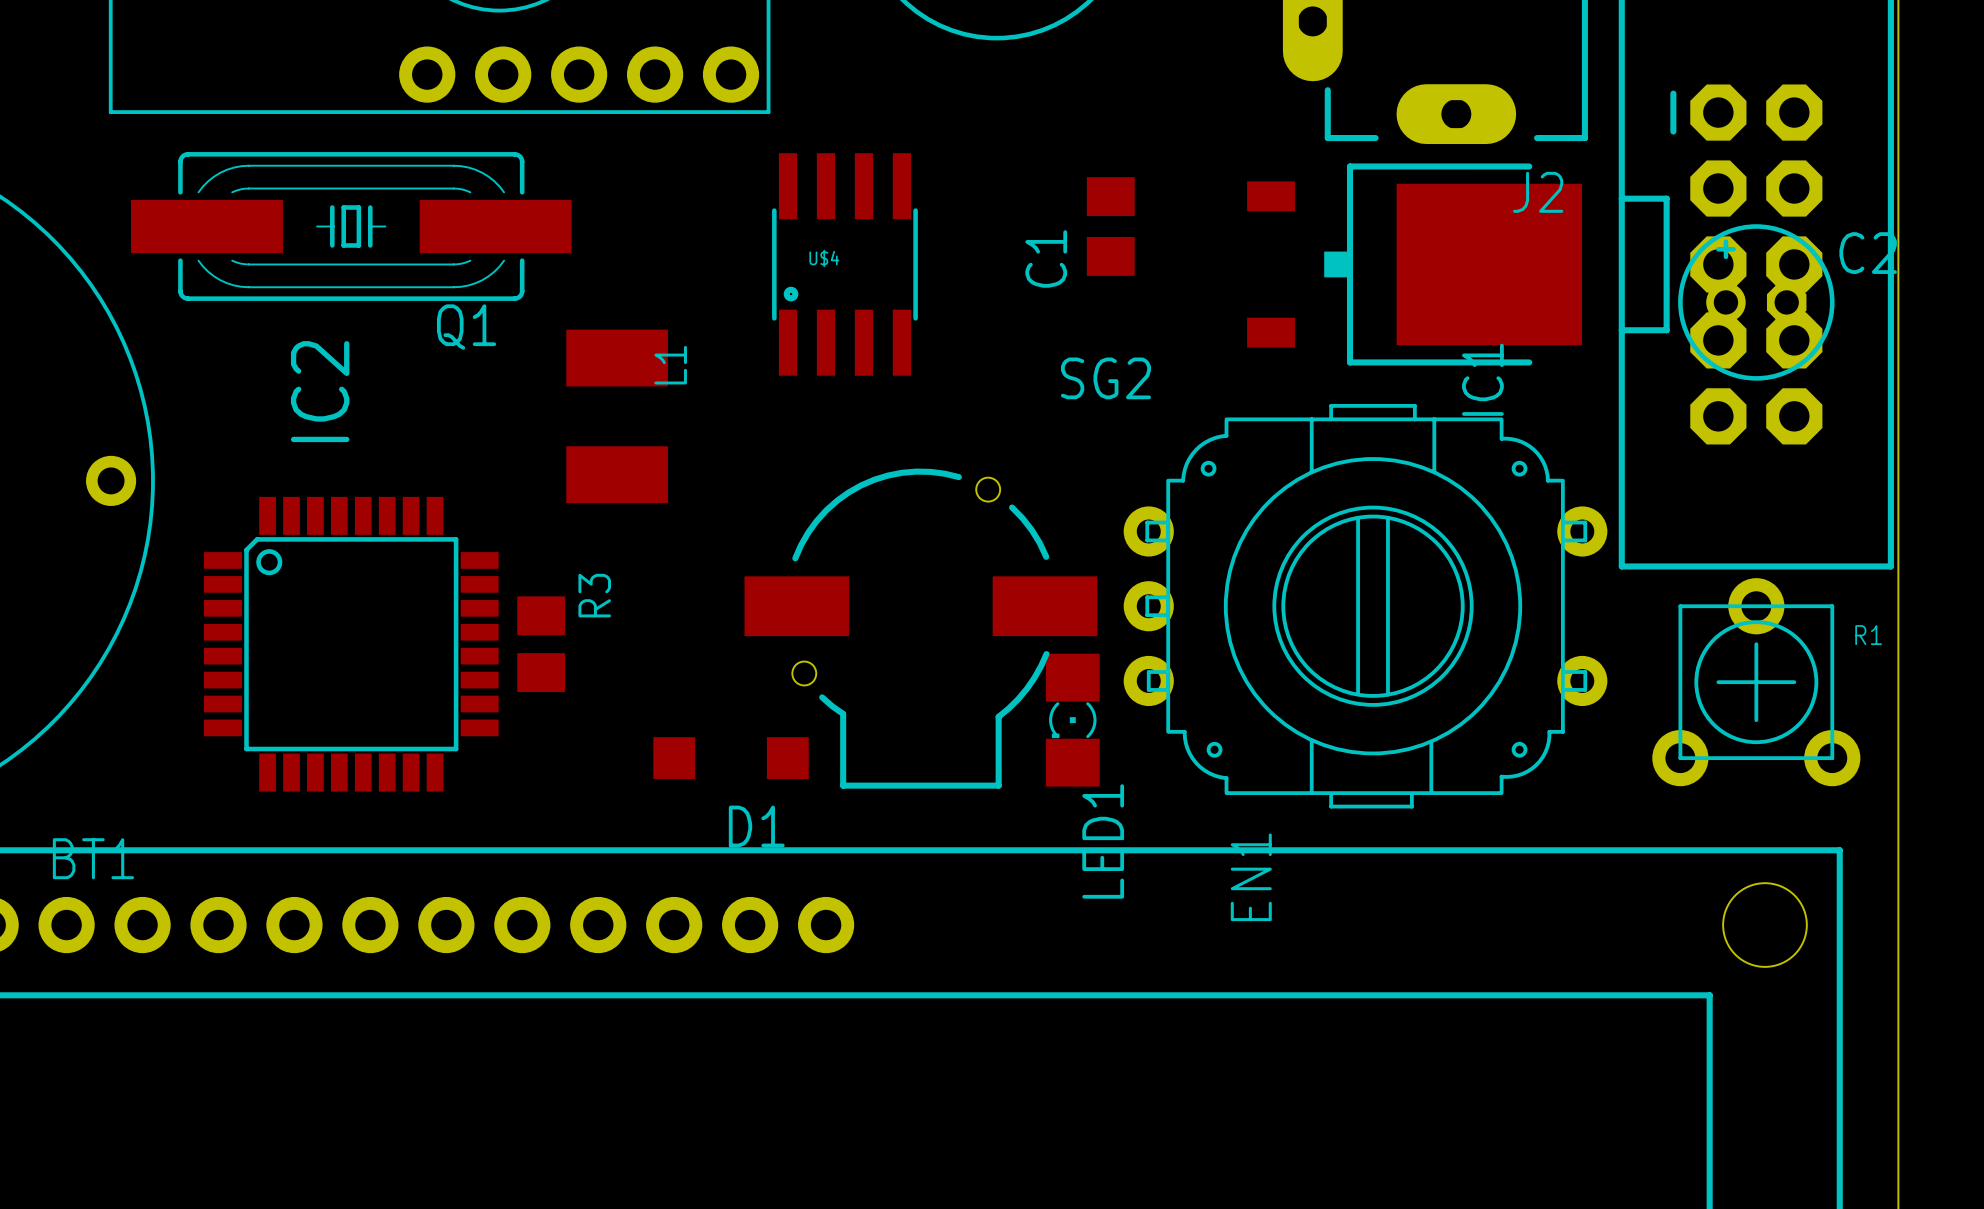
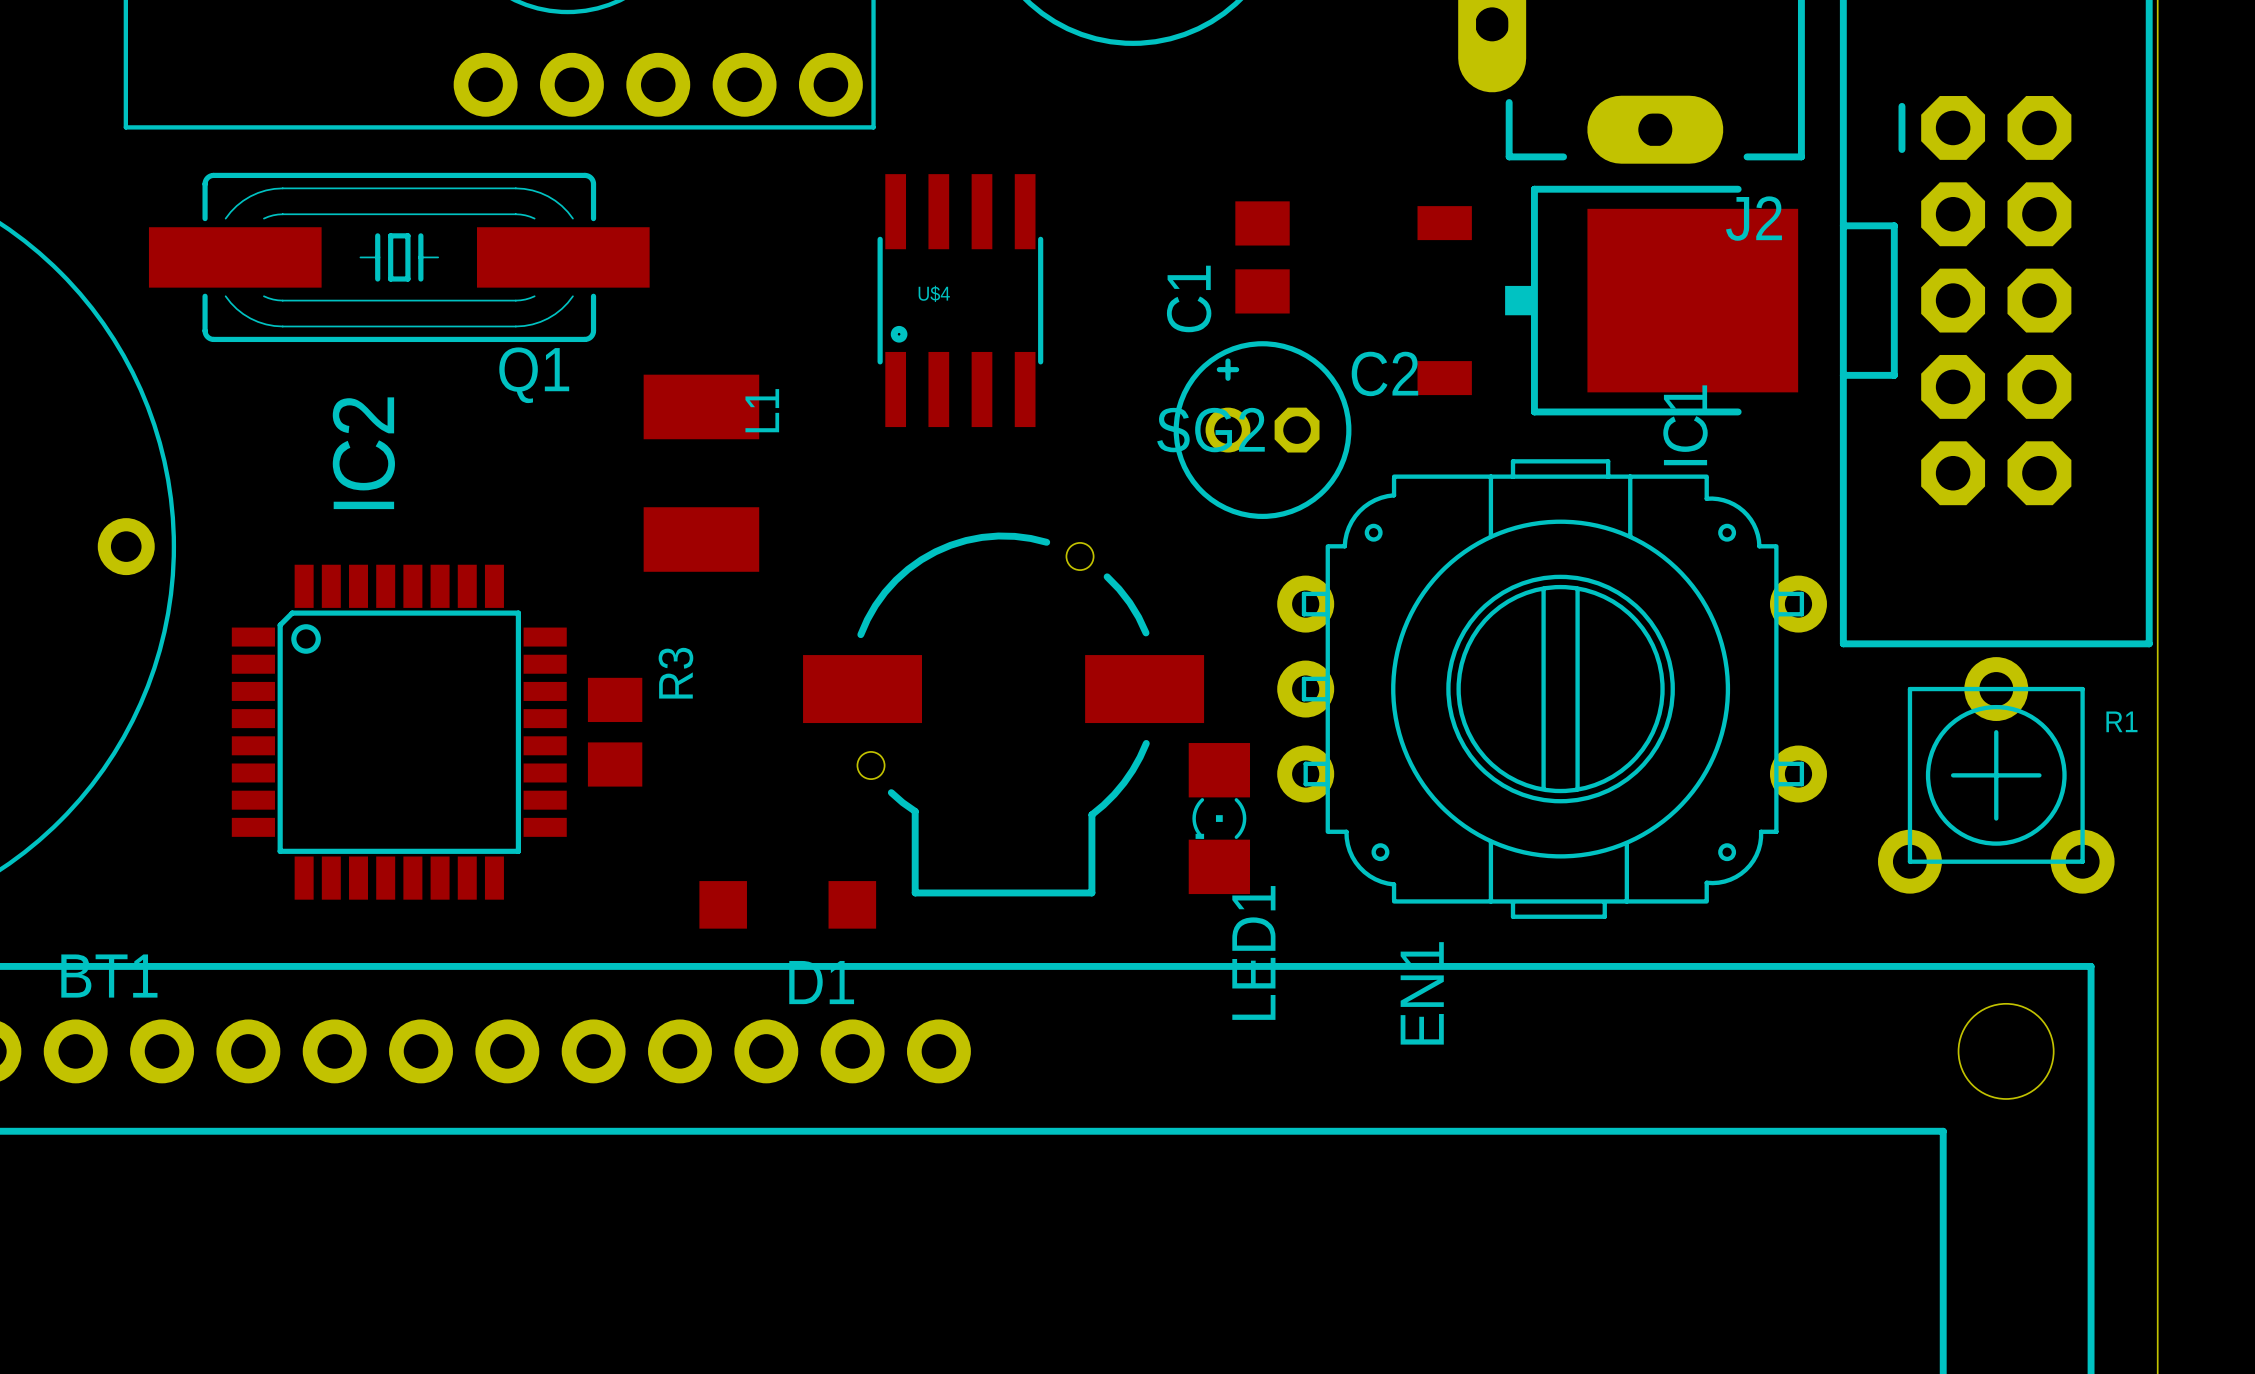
C2 position: (1756, 302) -> (1262, 430)
SG2 position: (920, 628) -> (1003, 714)
D1 position: (731, 758) -> (787, 904)

